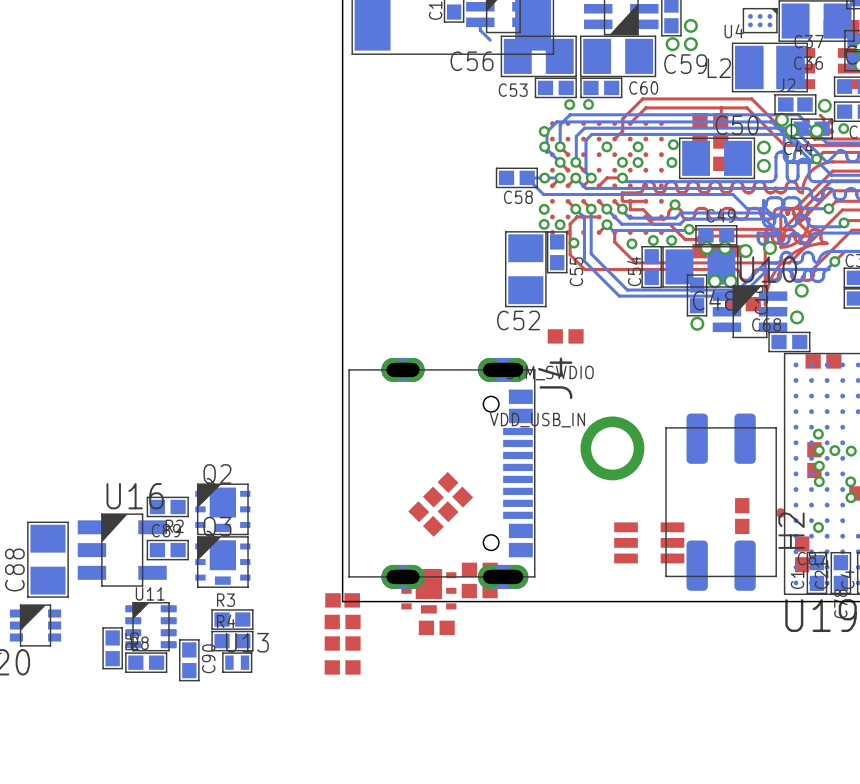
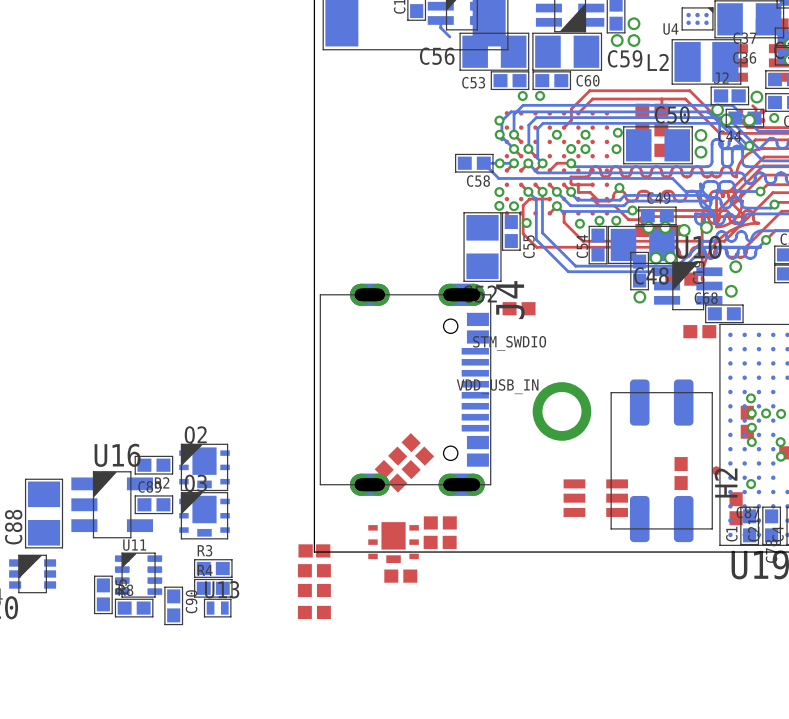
part position: (823, 361) -> (699, 331)
J4 position: (441, 473) -> (405, 389)

